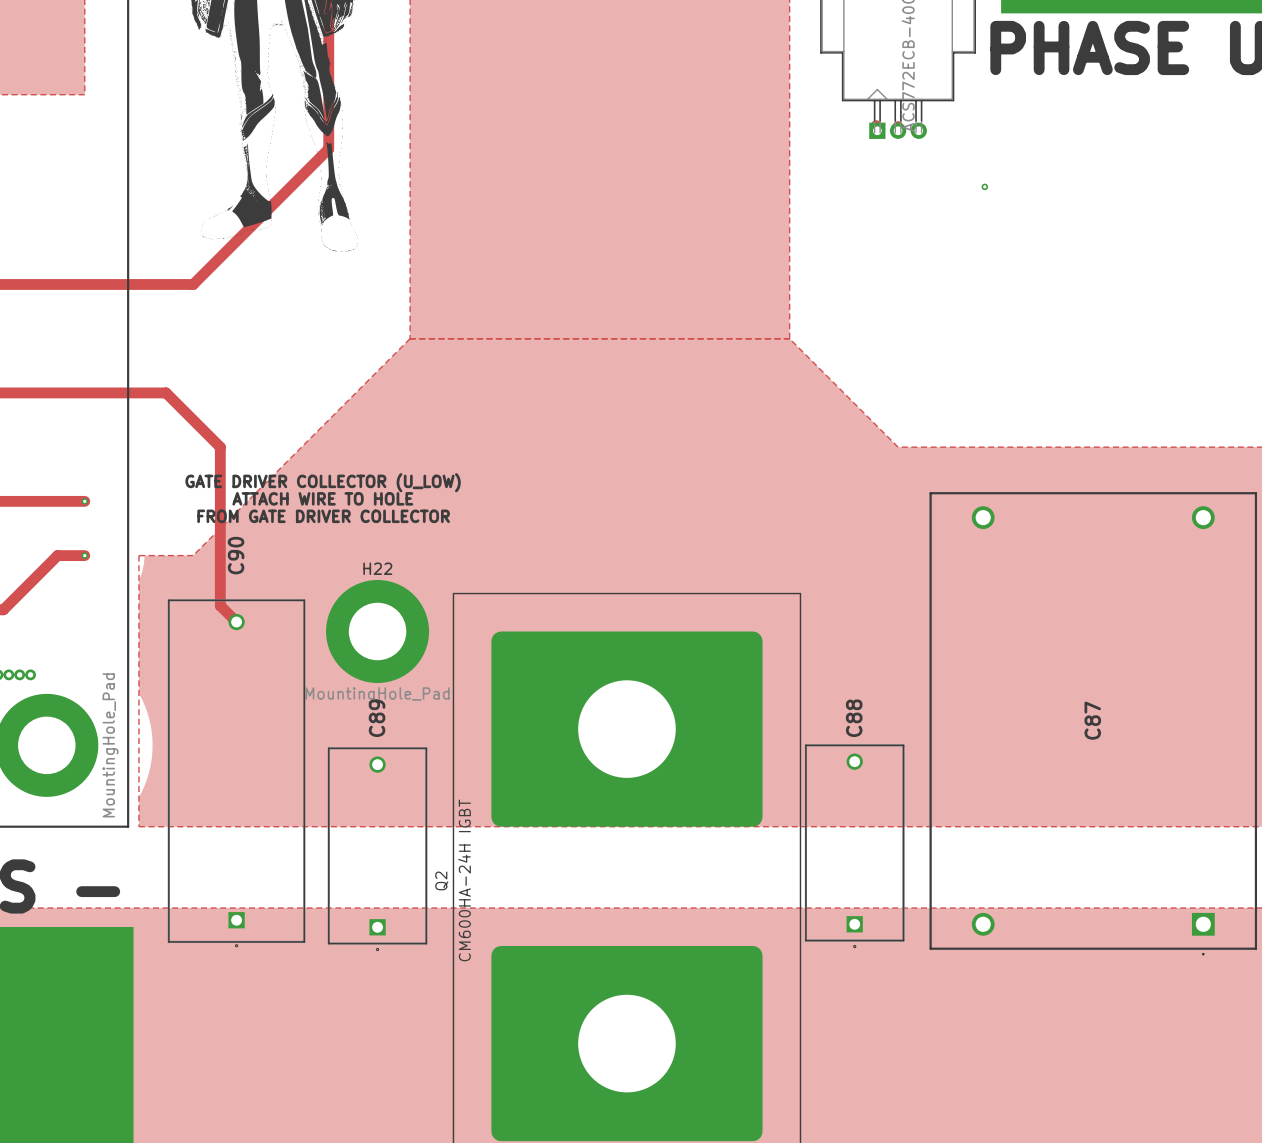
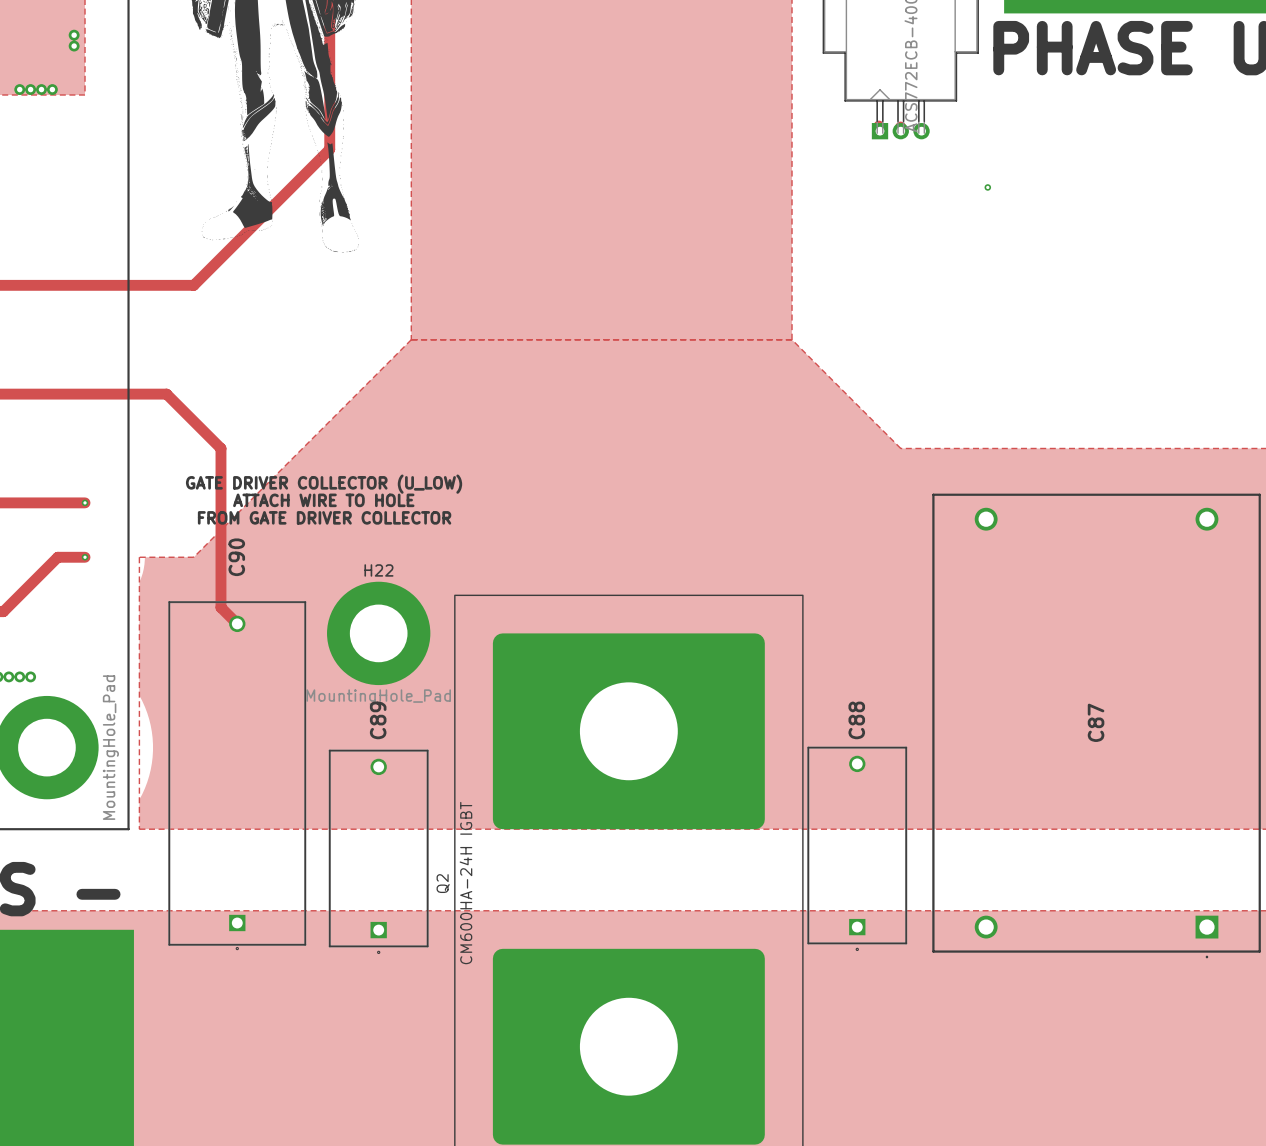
via: none -> (74, 35)
via: none -> (74, 46)
via: none -> (19, 89)
via: none -> (30, 89)
via: none -> (41, 89)
via: none -> (52, 89)

